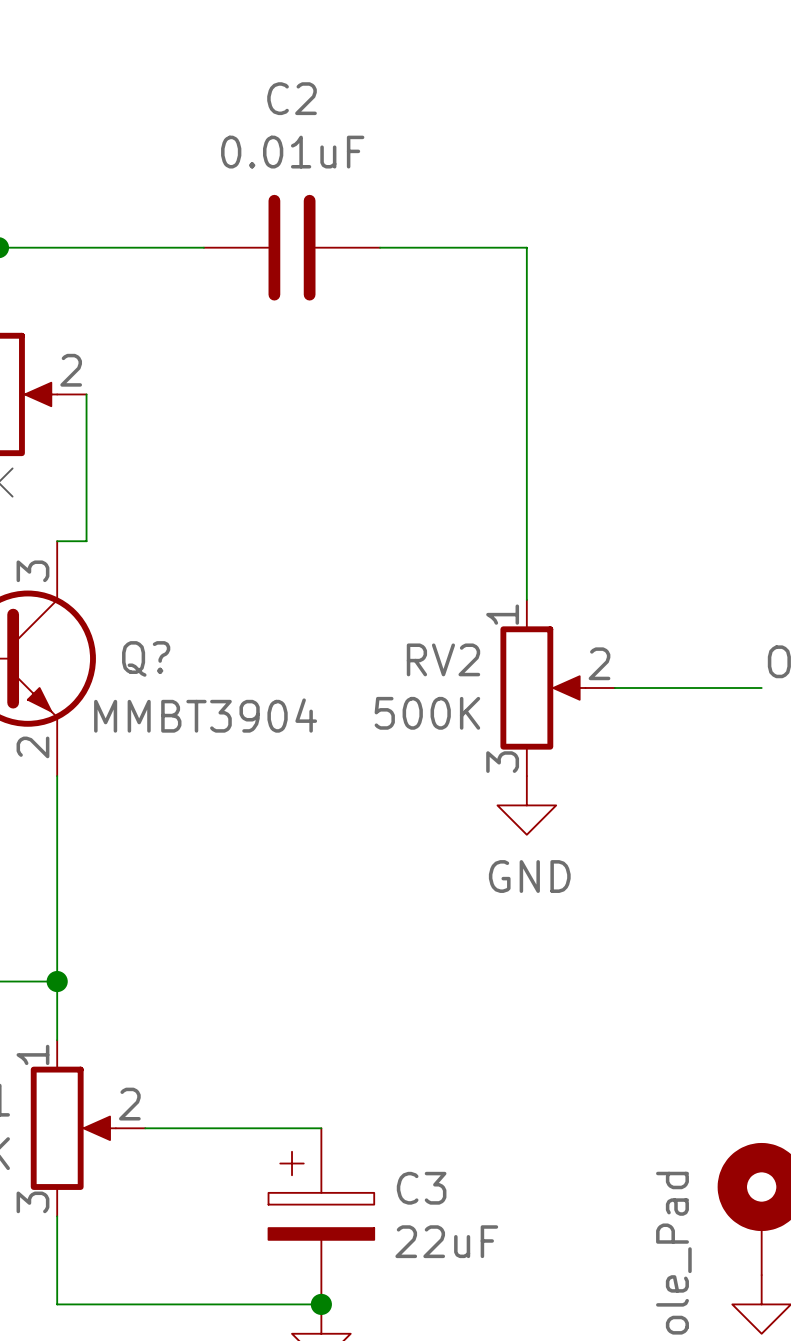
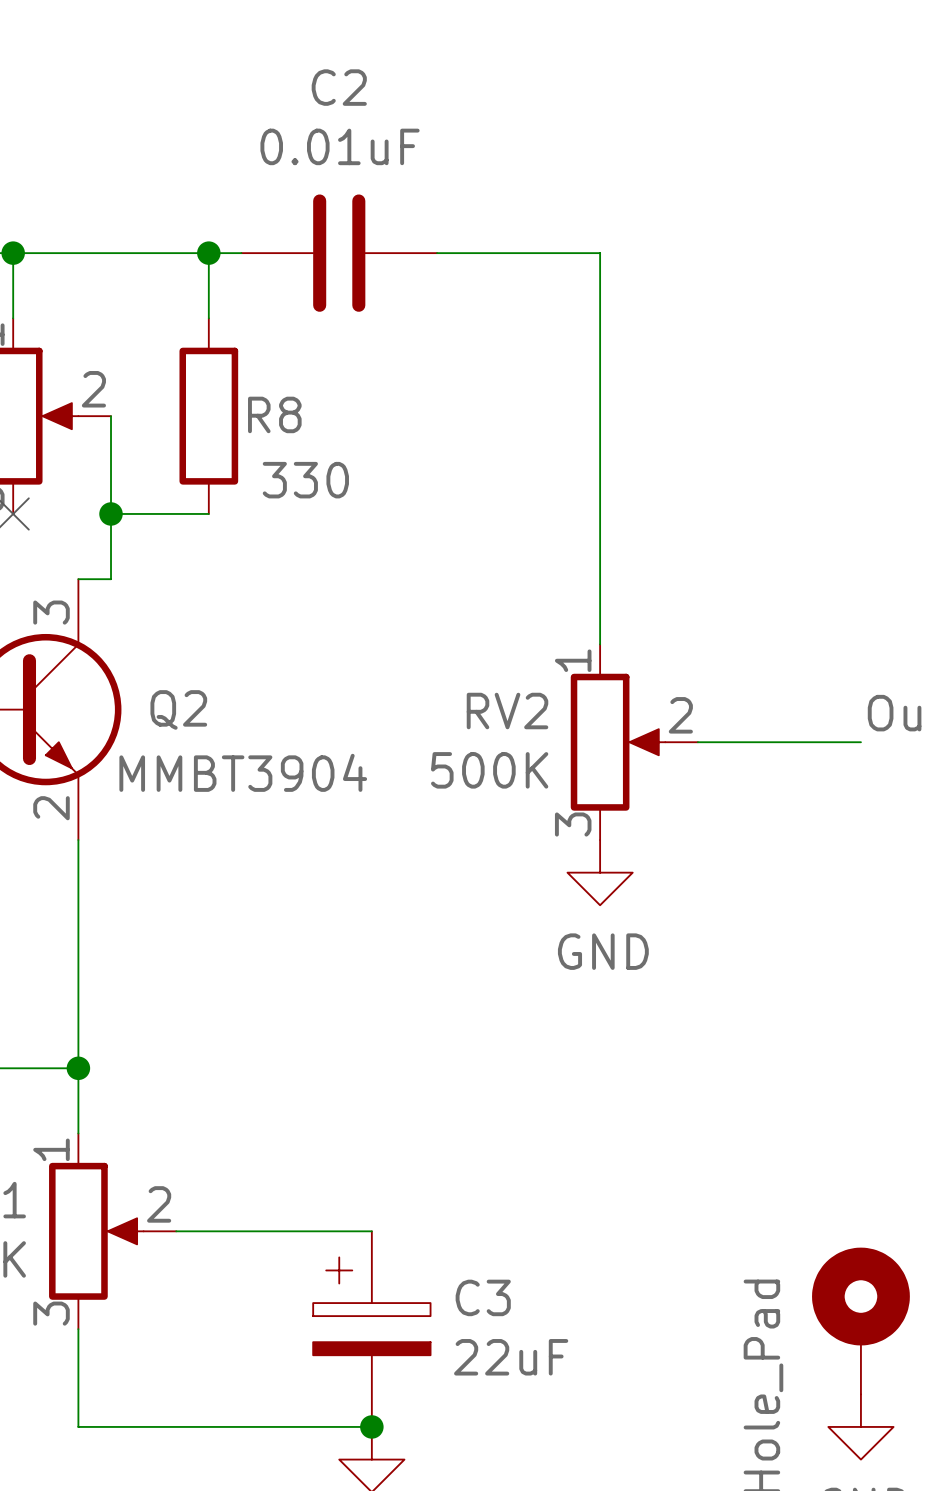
wire: none -> (208, 253) (208, 318)
junction: none -> (208, 253)
R8: none -> 330 (208, 416)
wire: none -> (111, 513) (208, 513)
junction: none -> (111, 513)
Q? name: Q? (146, 658) -> Q2 (178, 709)

